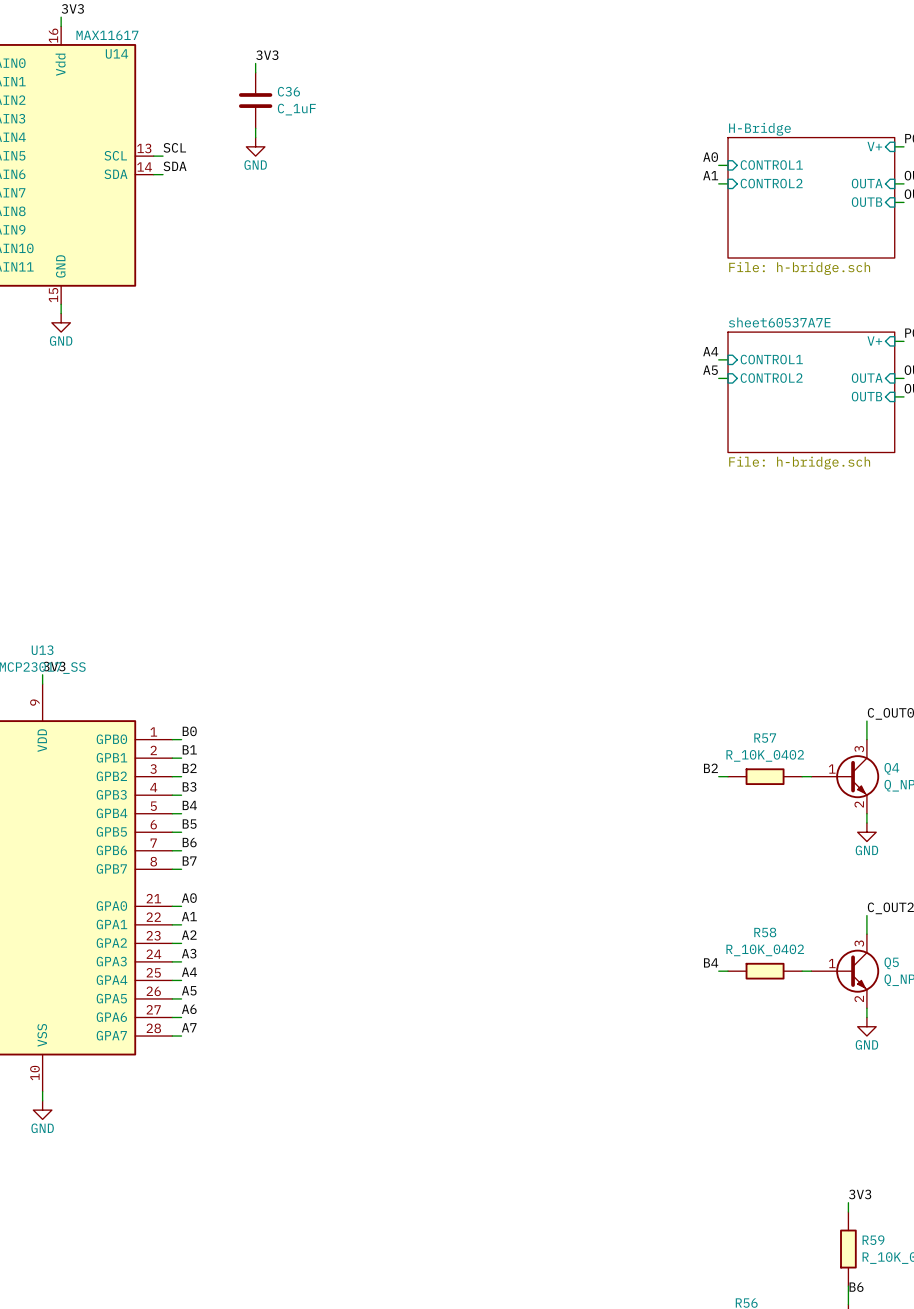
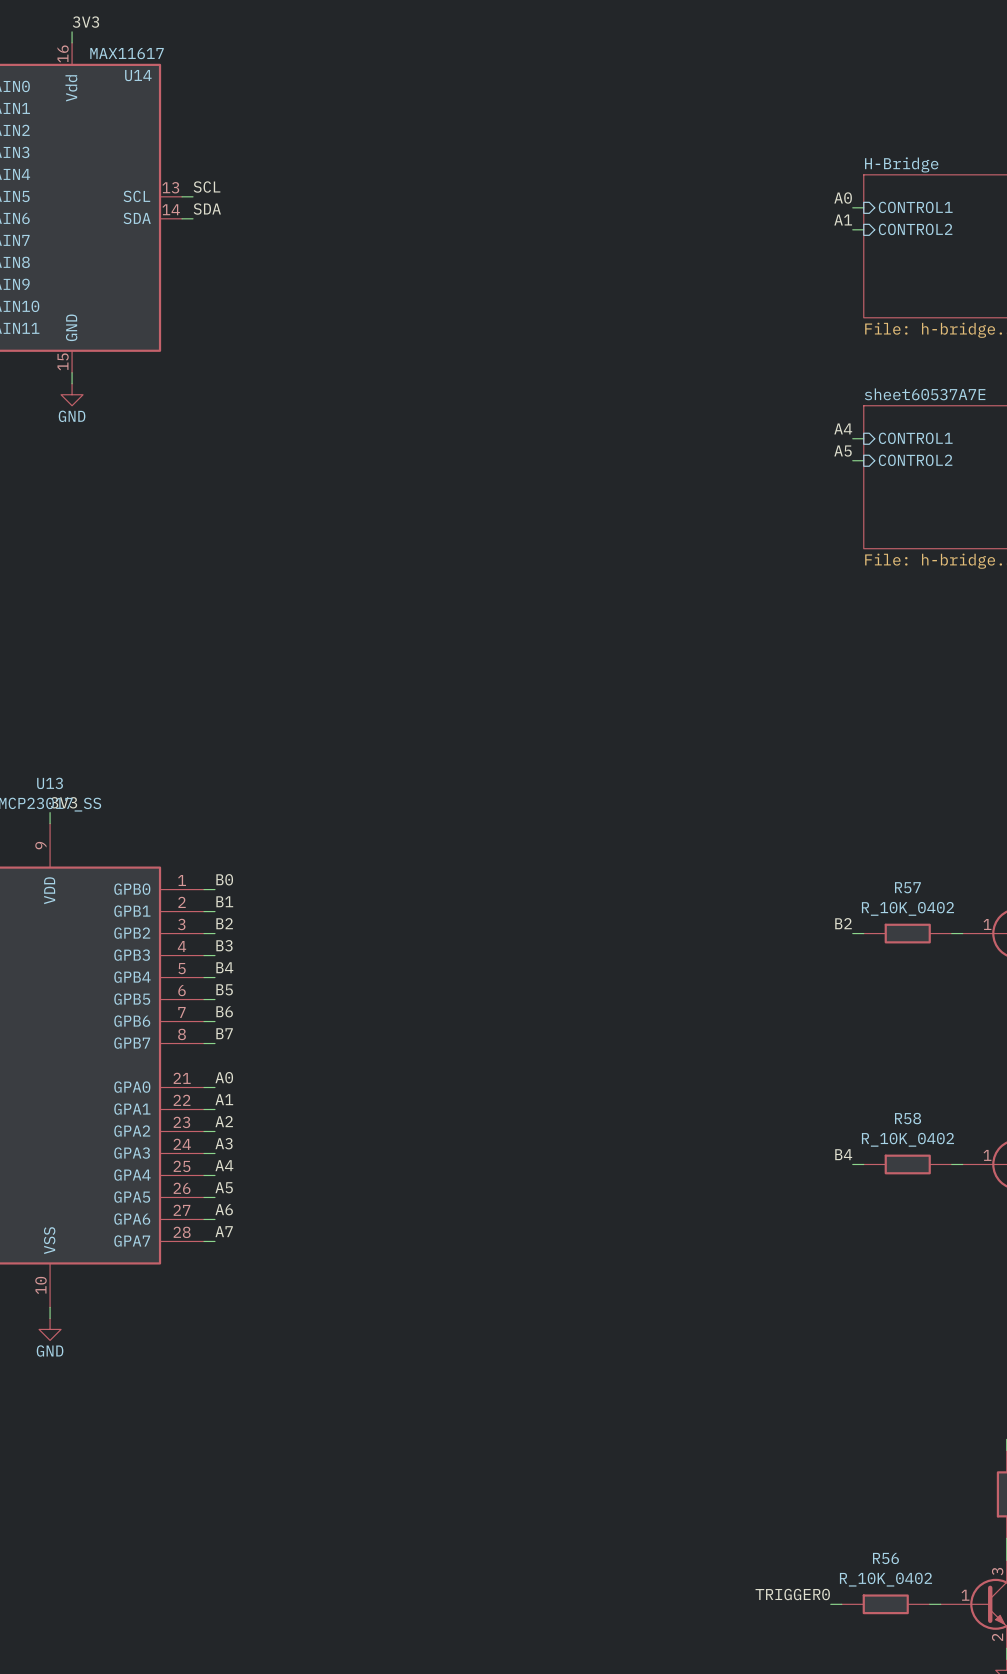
label: 3V3 (267, 55) -> none
wire: (255, 63) (255, 72) -> none
C36: C_1uF (255, 100) -> none
wire: (255, 128) (255, 137) -> none
power symbol: GND (255, 146) -> none

